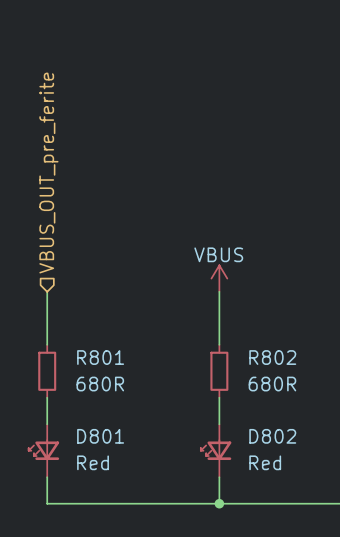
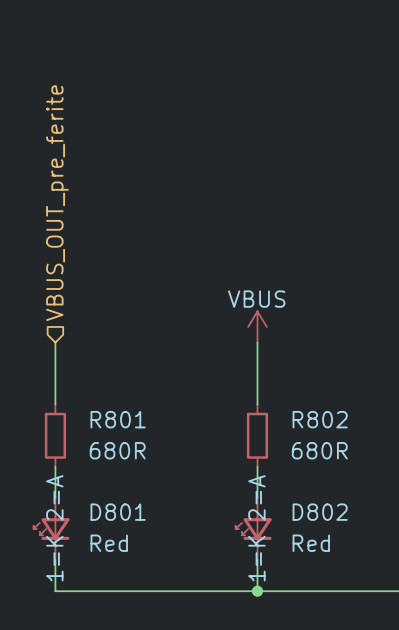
D801 text: none -> 1=K 2=A (54, 528)
D802 text: none -> 1=K 2=A (256, 528)

